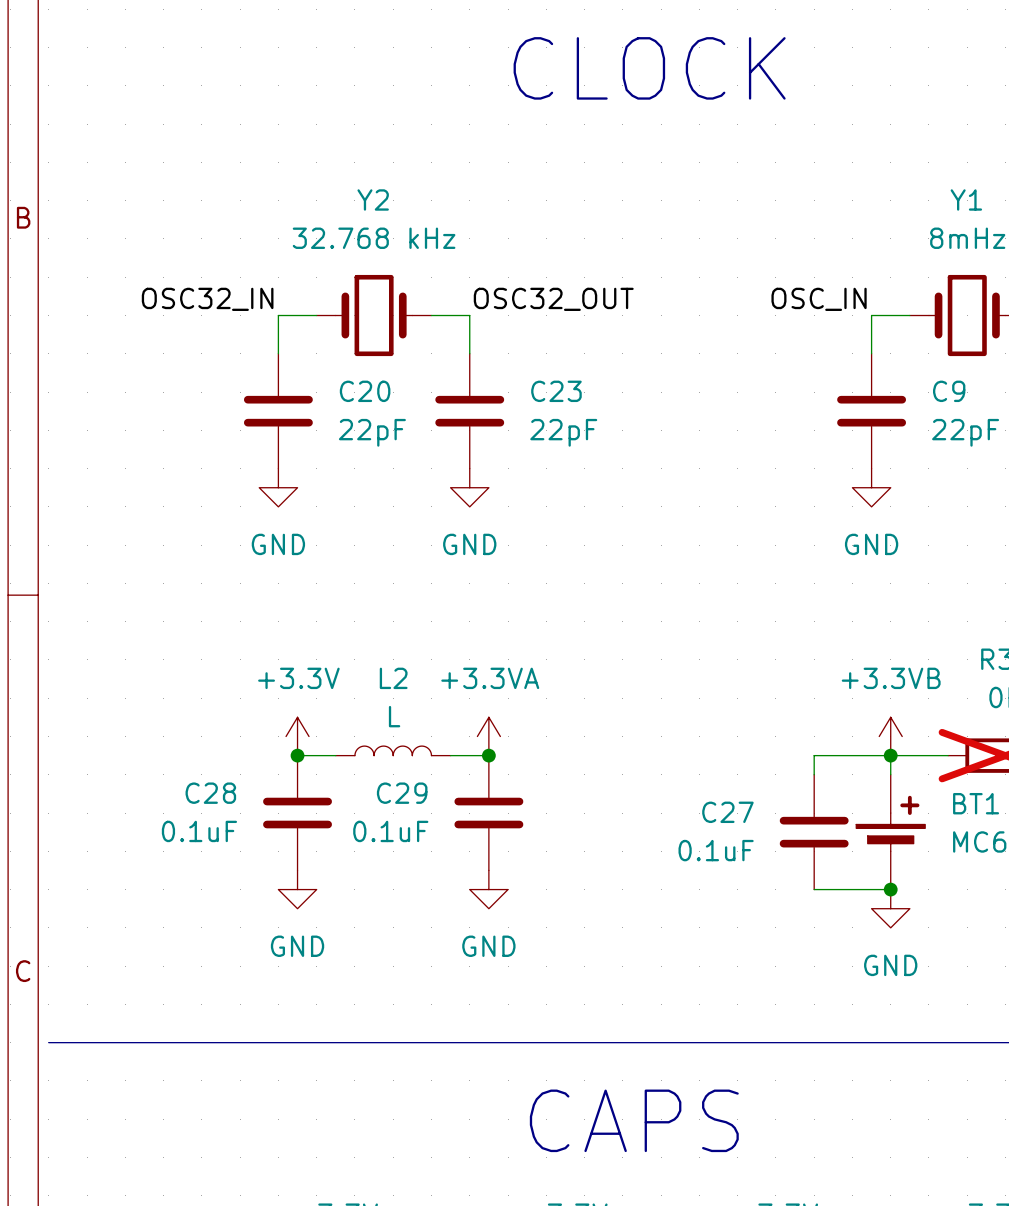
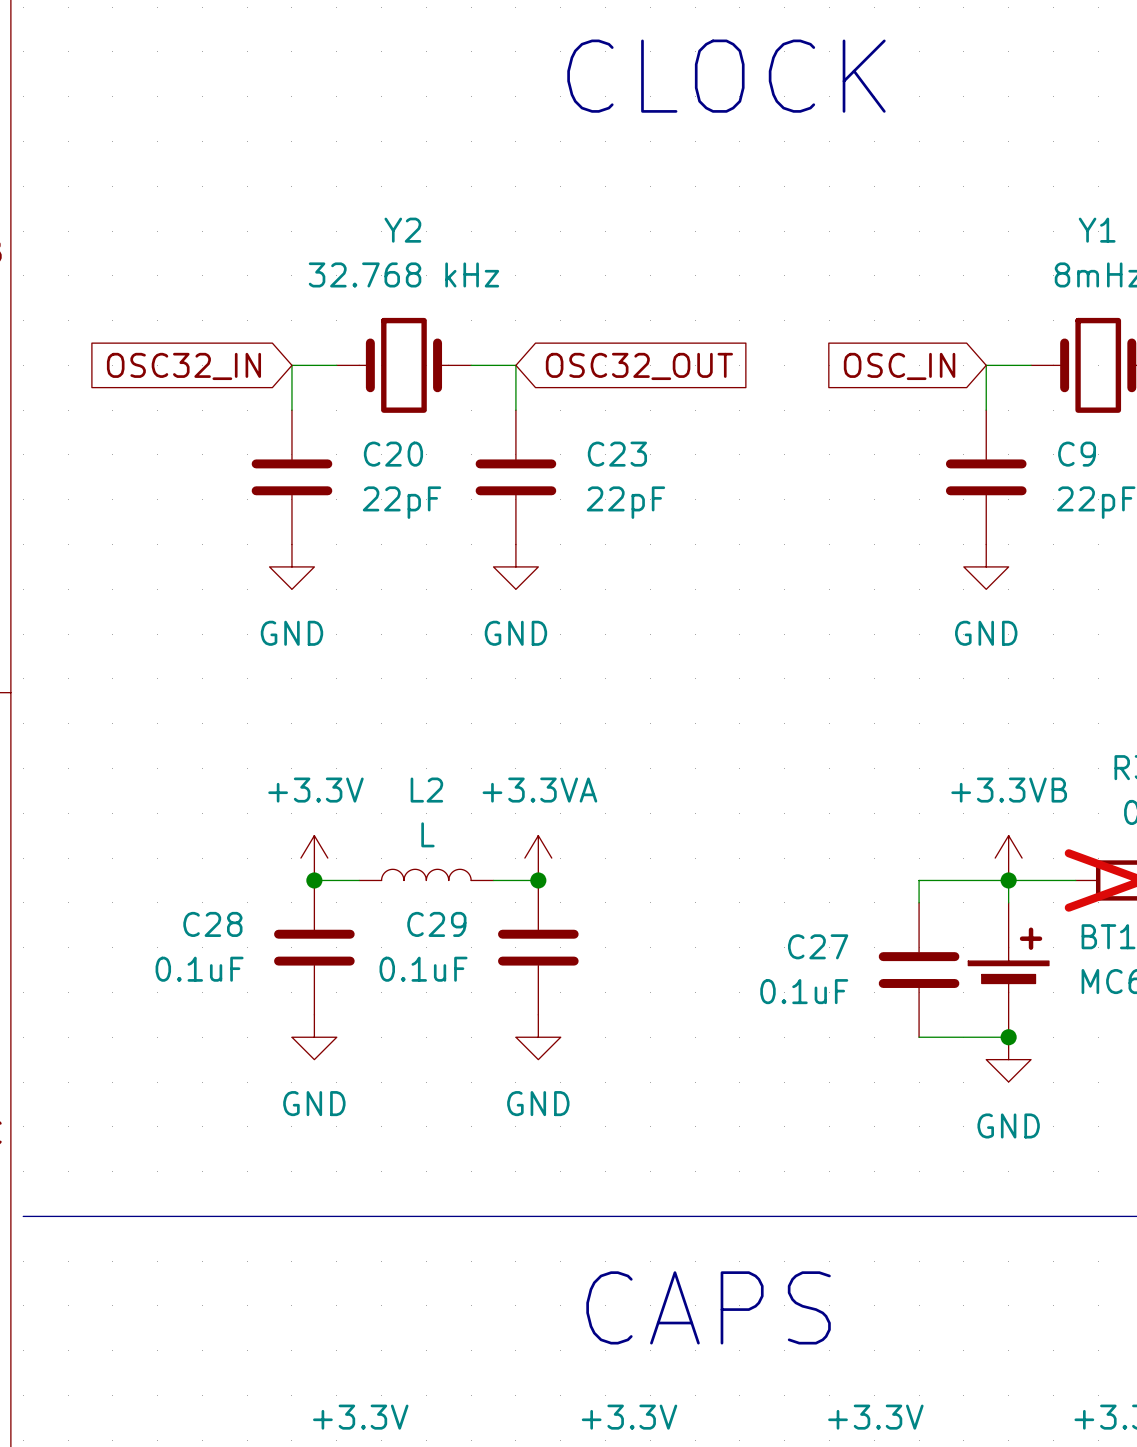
label: OSC32_IN (207, 299) -> none
label: OSC32_OUT (553, 299) -> none
label: OSC_IN (819, 299) -> none
global label: none -> OSC32_IN (183, 366)
global label: none -> OSC32_OUT (639, 366)
global label: none -> OSC_IN (899, 366)

